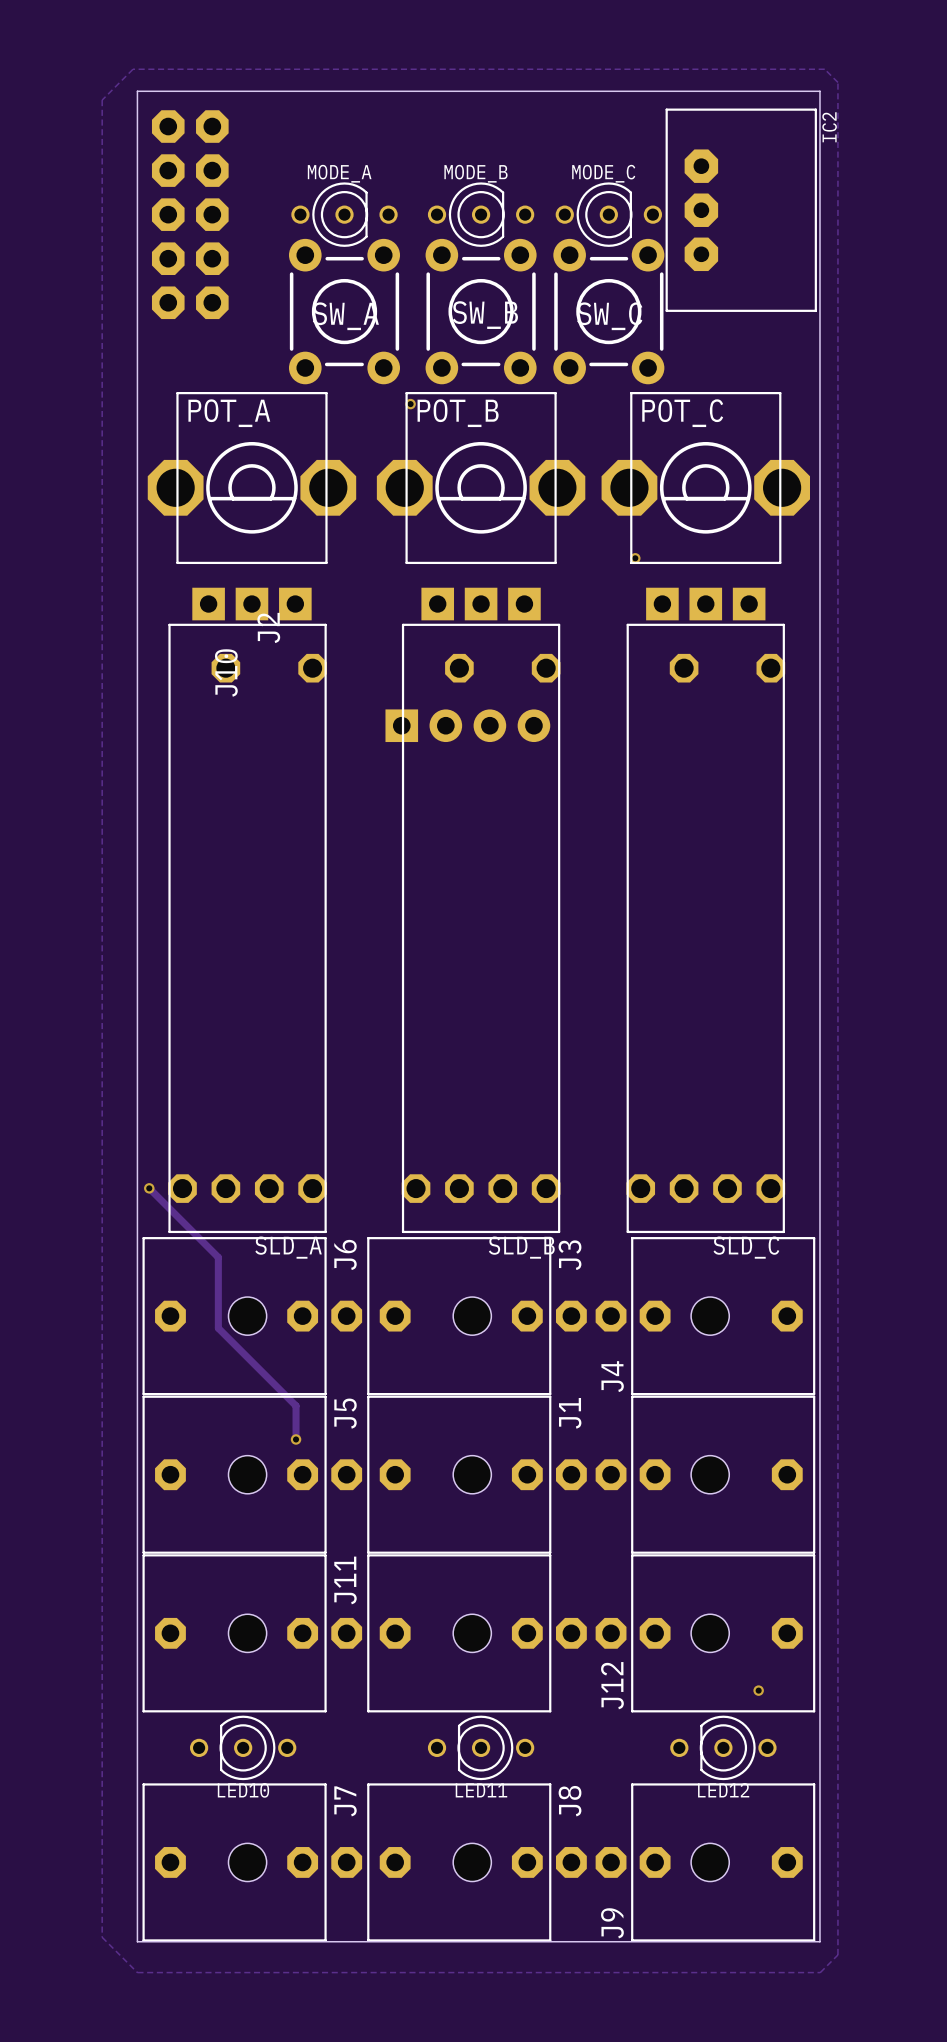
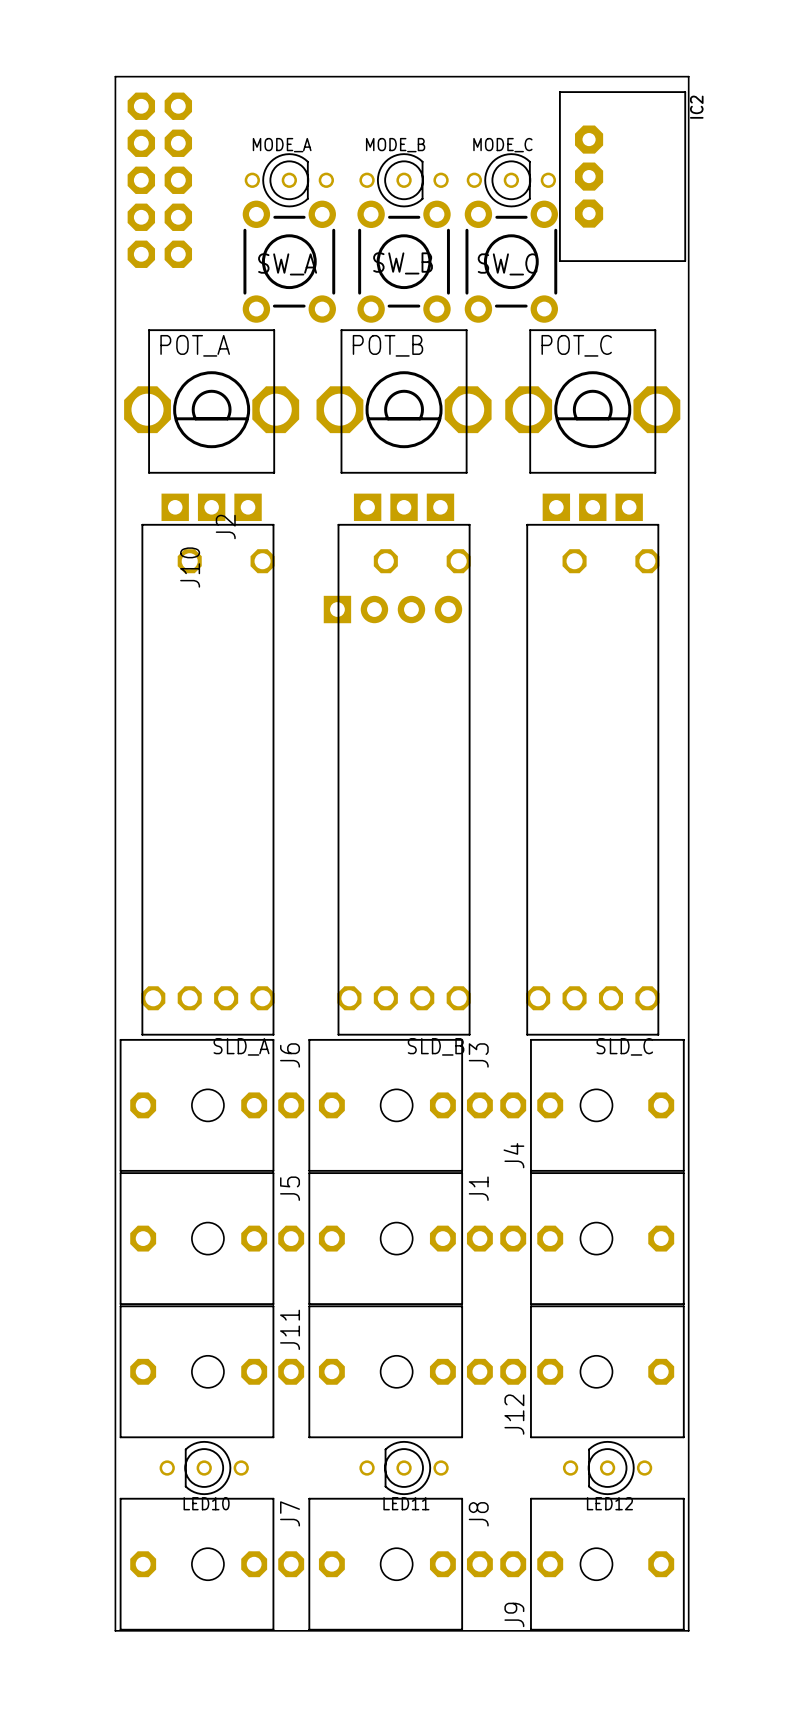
zone outline: (133, 69) (824, 69) (837, 82) (837, 1954) (820, 1972) (137, 1972) (102, 1937) (102, 100) (133, 69) -> none
via: (410, 404) -> none
via: (635, 558) -> none
track: (149, 1188) (218, 1257) (218, 1328) (296, 1405) (296, 1439) -> none
via: (149, 1188) -> none
via: (296, 1439) -> none
via: (758, 1690) -> none

